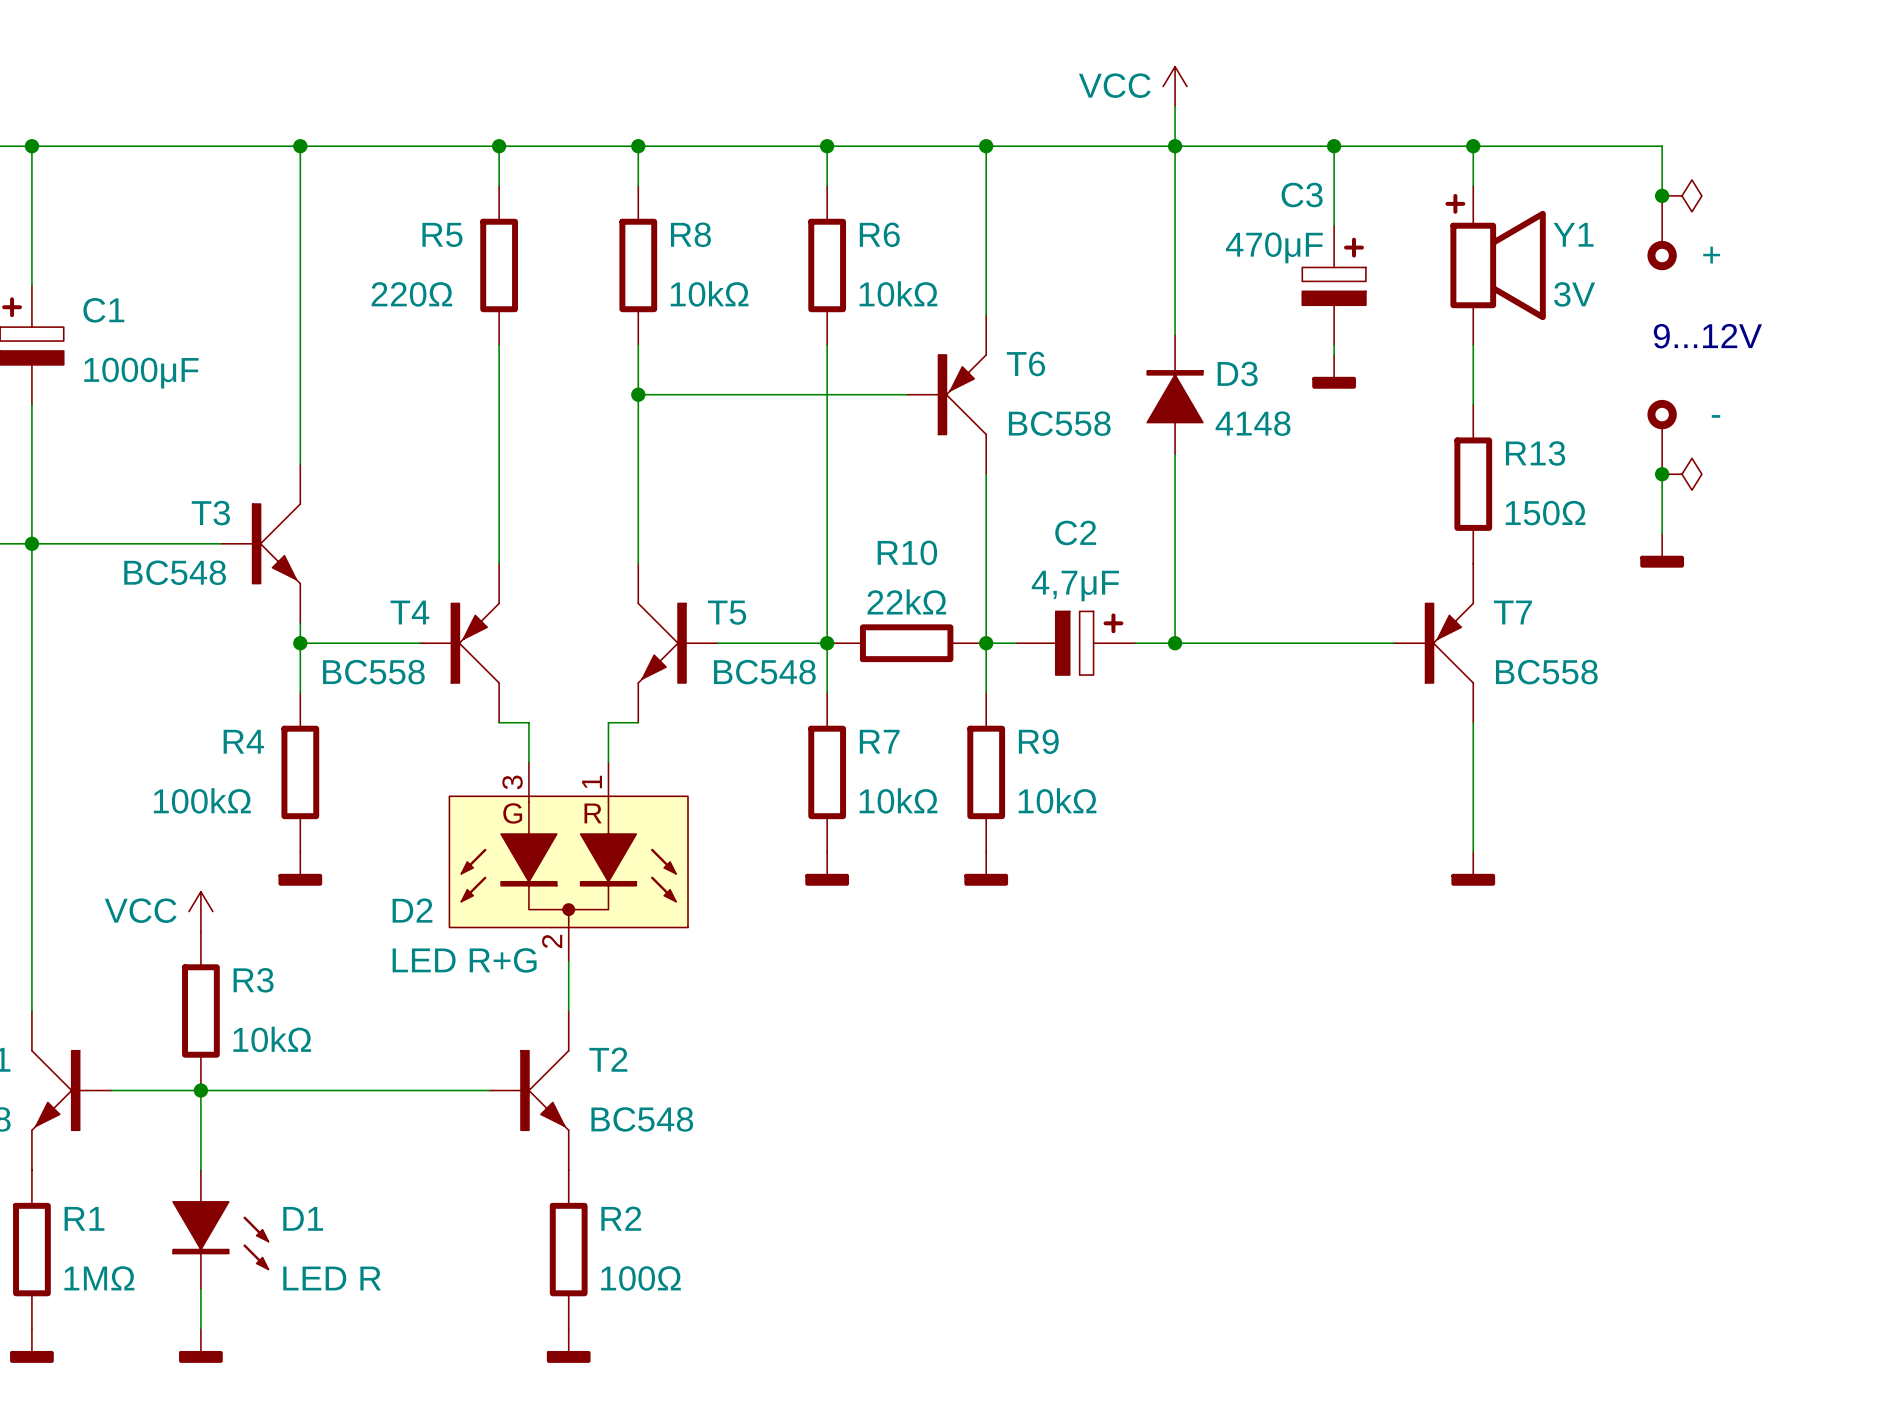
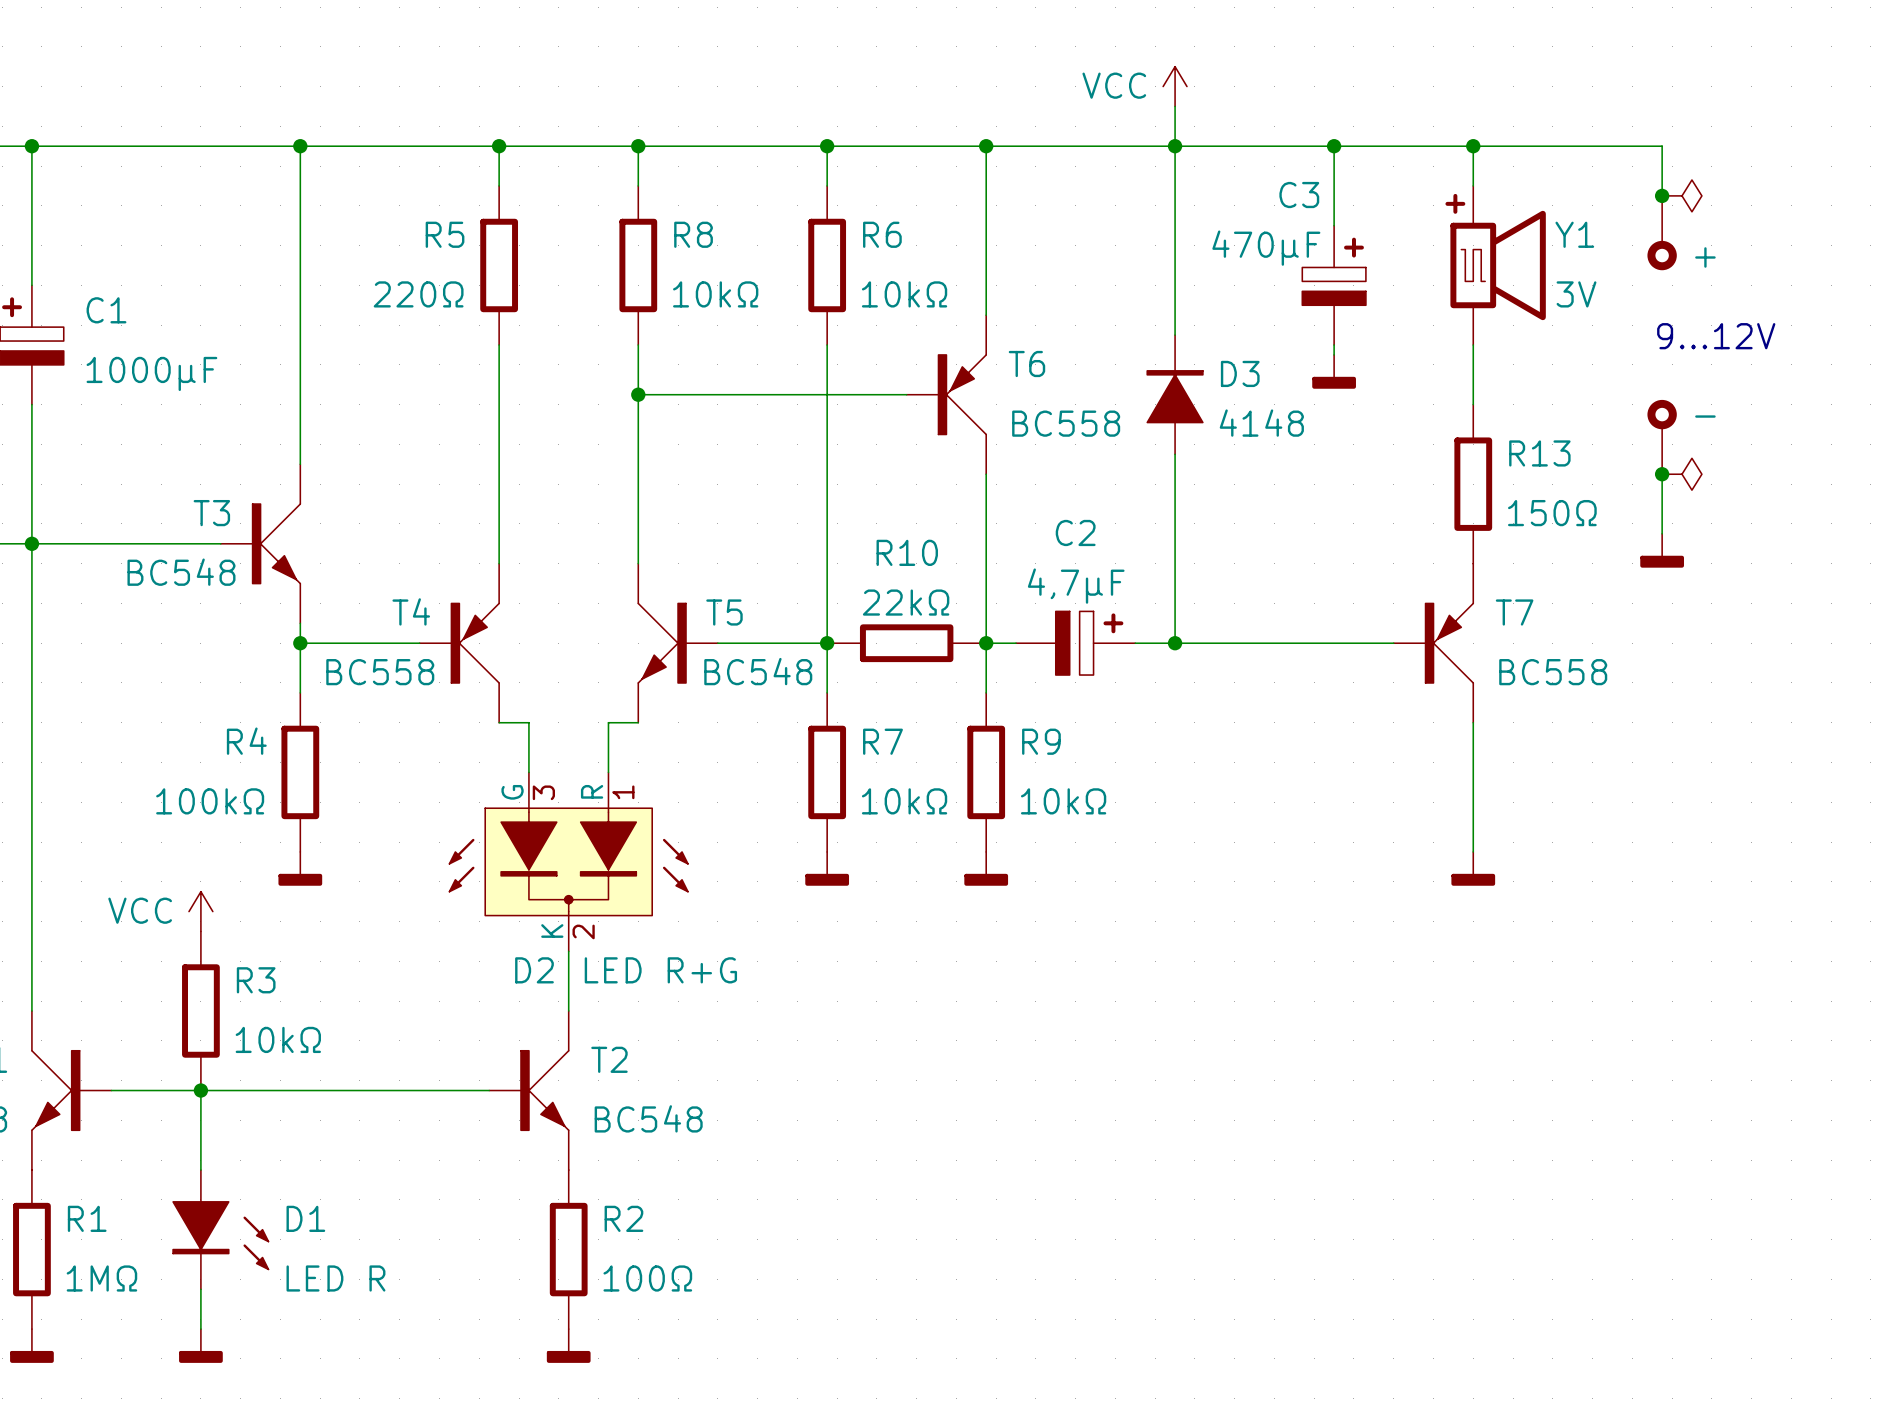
Y1 symbol: [1445, 185, 1546, 346] -> [1445, 185, 1546, 346]
D2 symbol: [449, 762, 689, 962] -> [449, 772, 688, 952]
D2 name position: D2 (412, 910) -> D2 (534, 970)
D2 value position: LED R+G (464, 960) -> LED R+G (660, 970)

